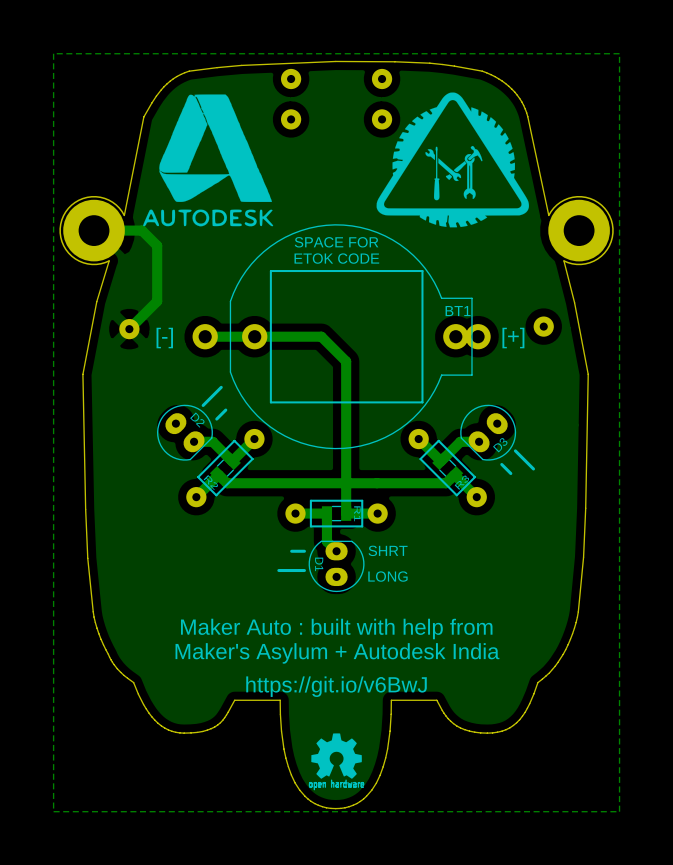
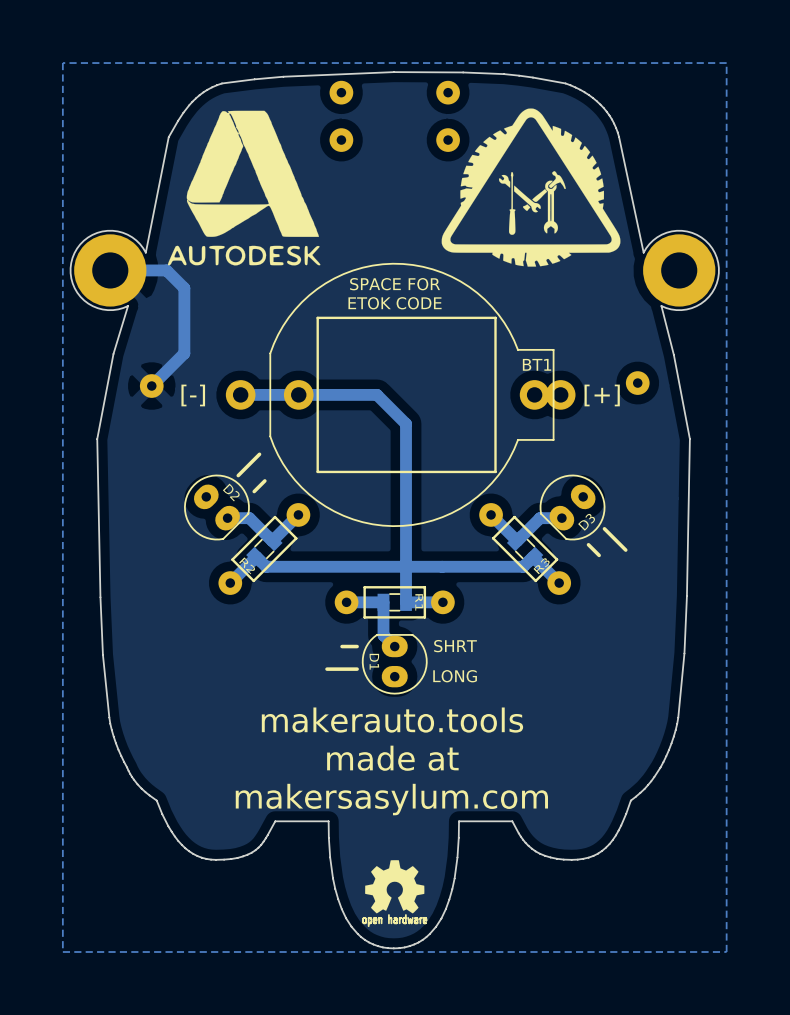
text: none -> makerauto.tools (392, 720)
text: Maker Auto : built with help from (336, 629) -> none
text: Maker's Asylum + Autodesk India (337, 653) -> made at (392, 758)
text: https://git.io/v6BwJ (336, 686) -> makersasylum.com (391, 799)

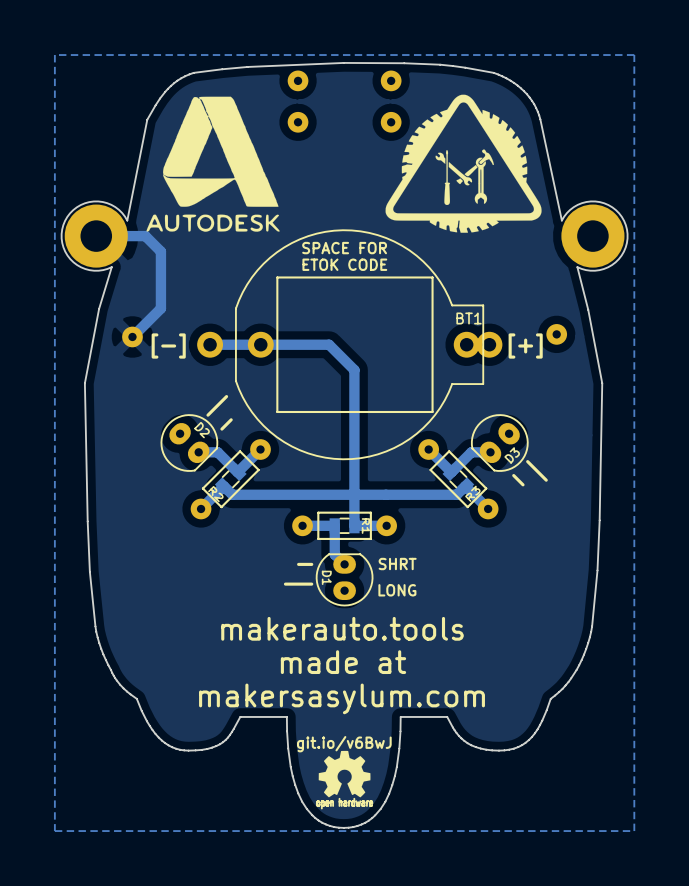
text: none -> git.io/v6BwJ (344, 744)

